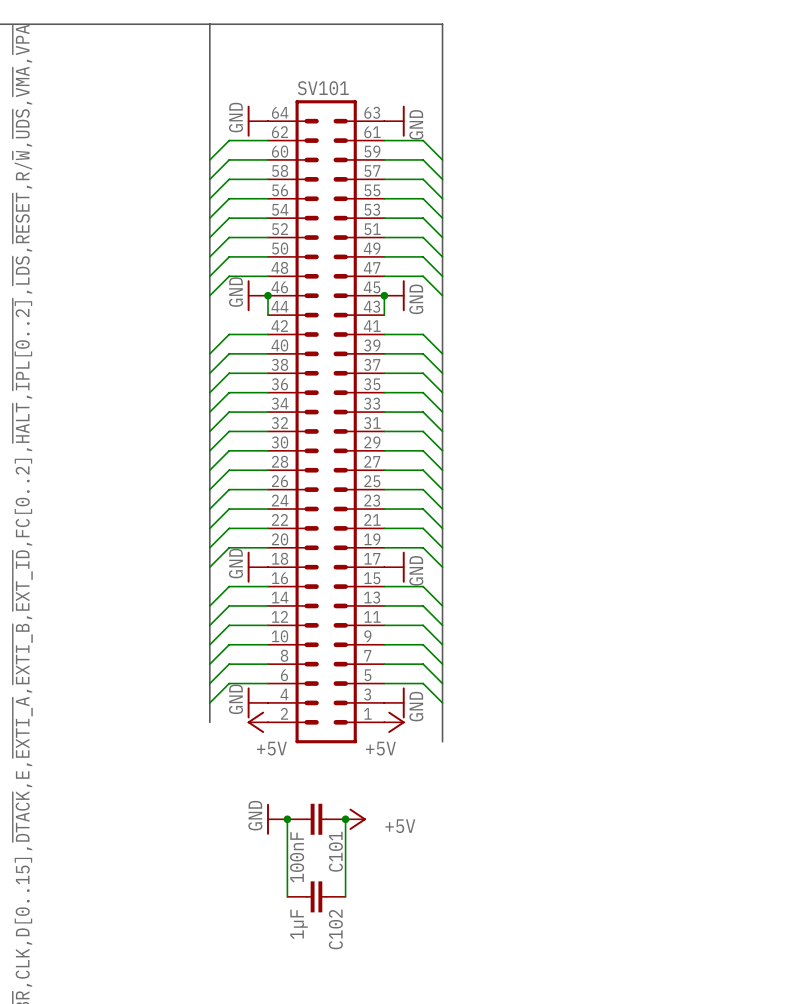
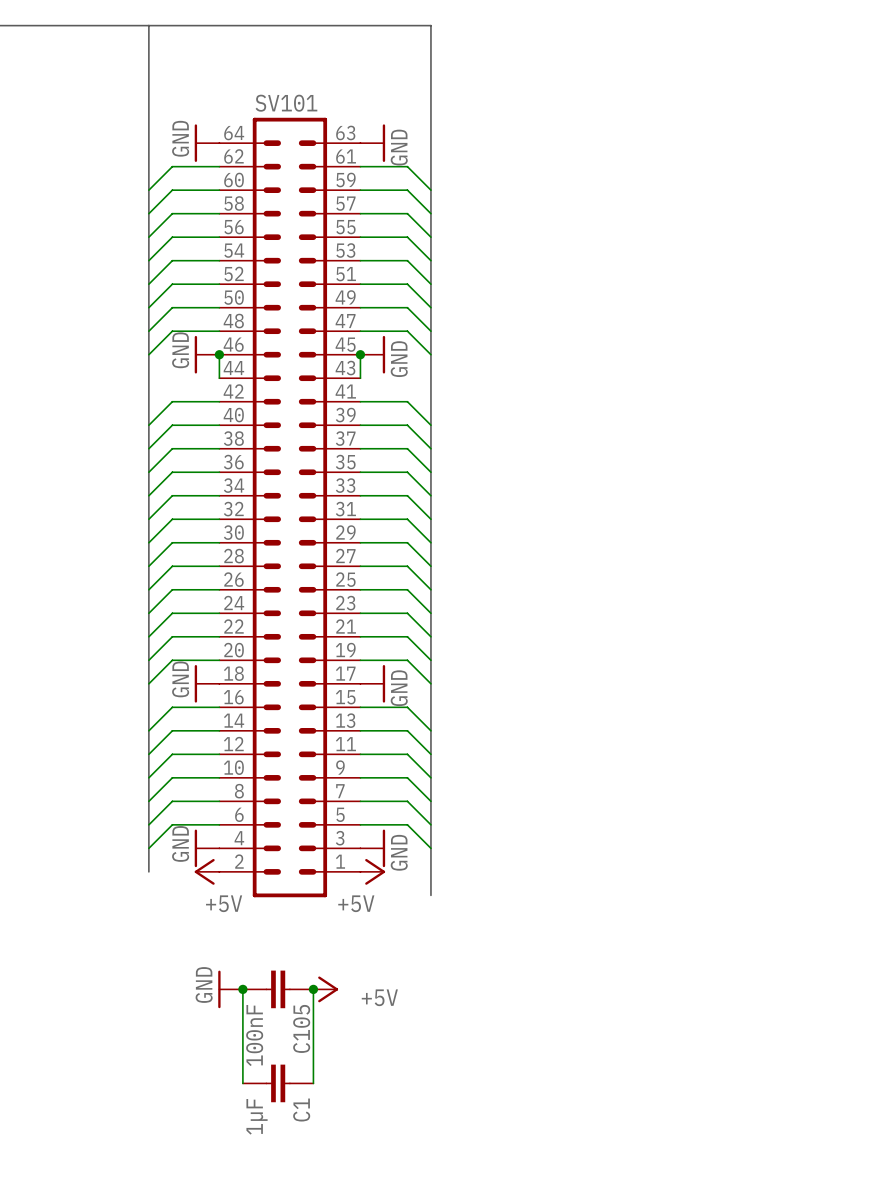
C101 name: C101 (335, 851) -> C105 (301, 1028)
C102 name: C102 (335, 929) -> C1 (301, 1110)

